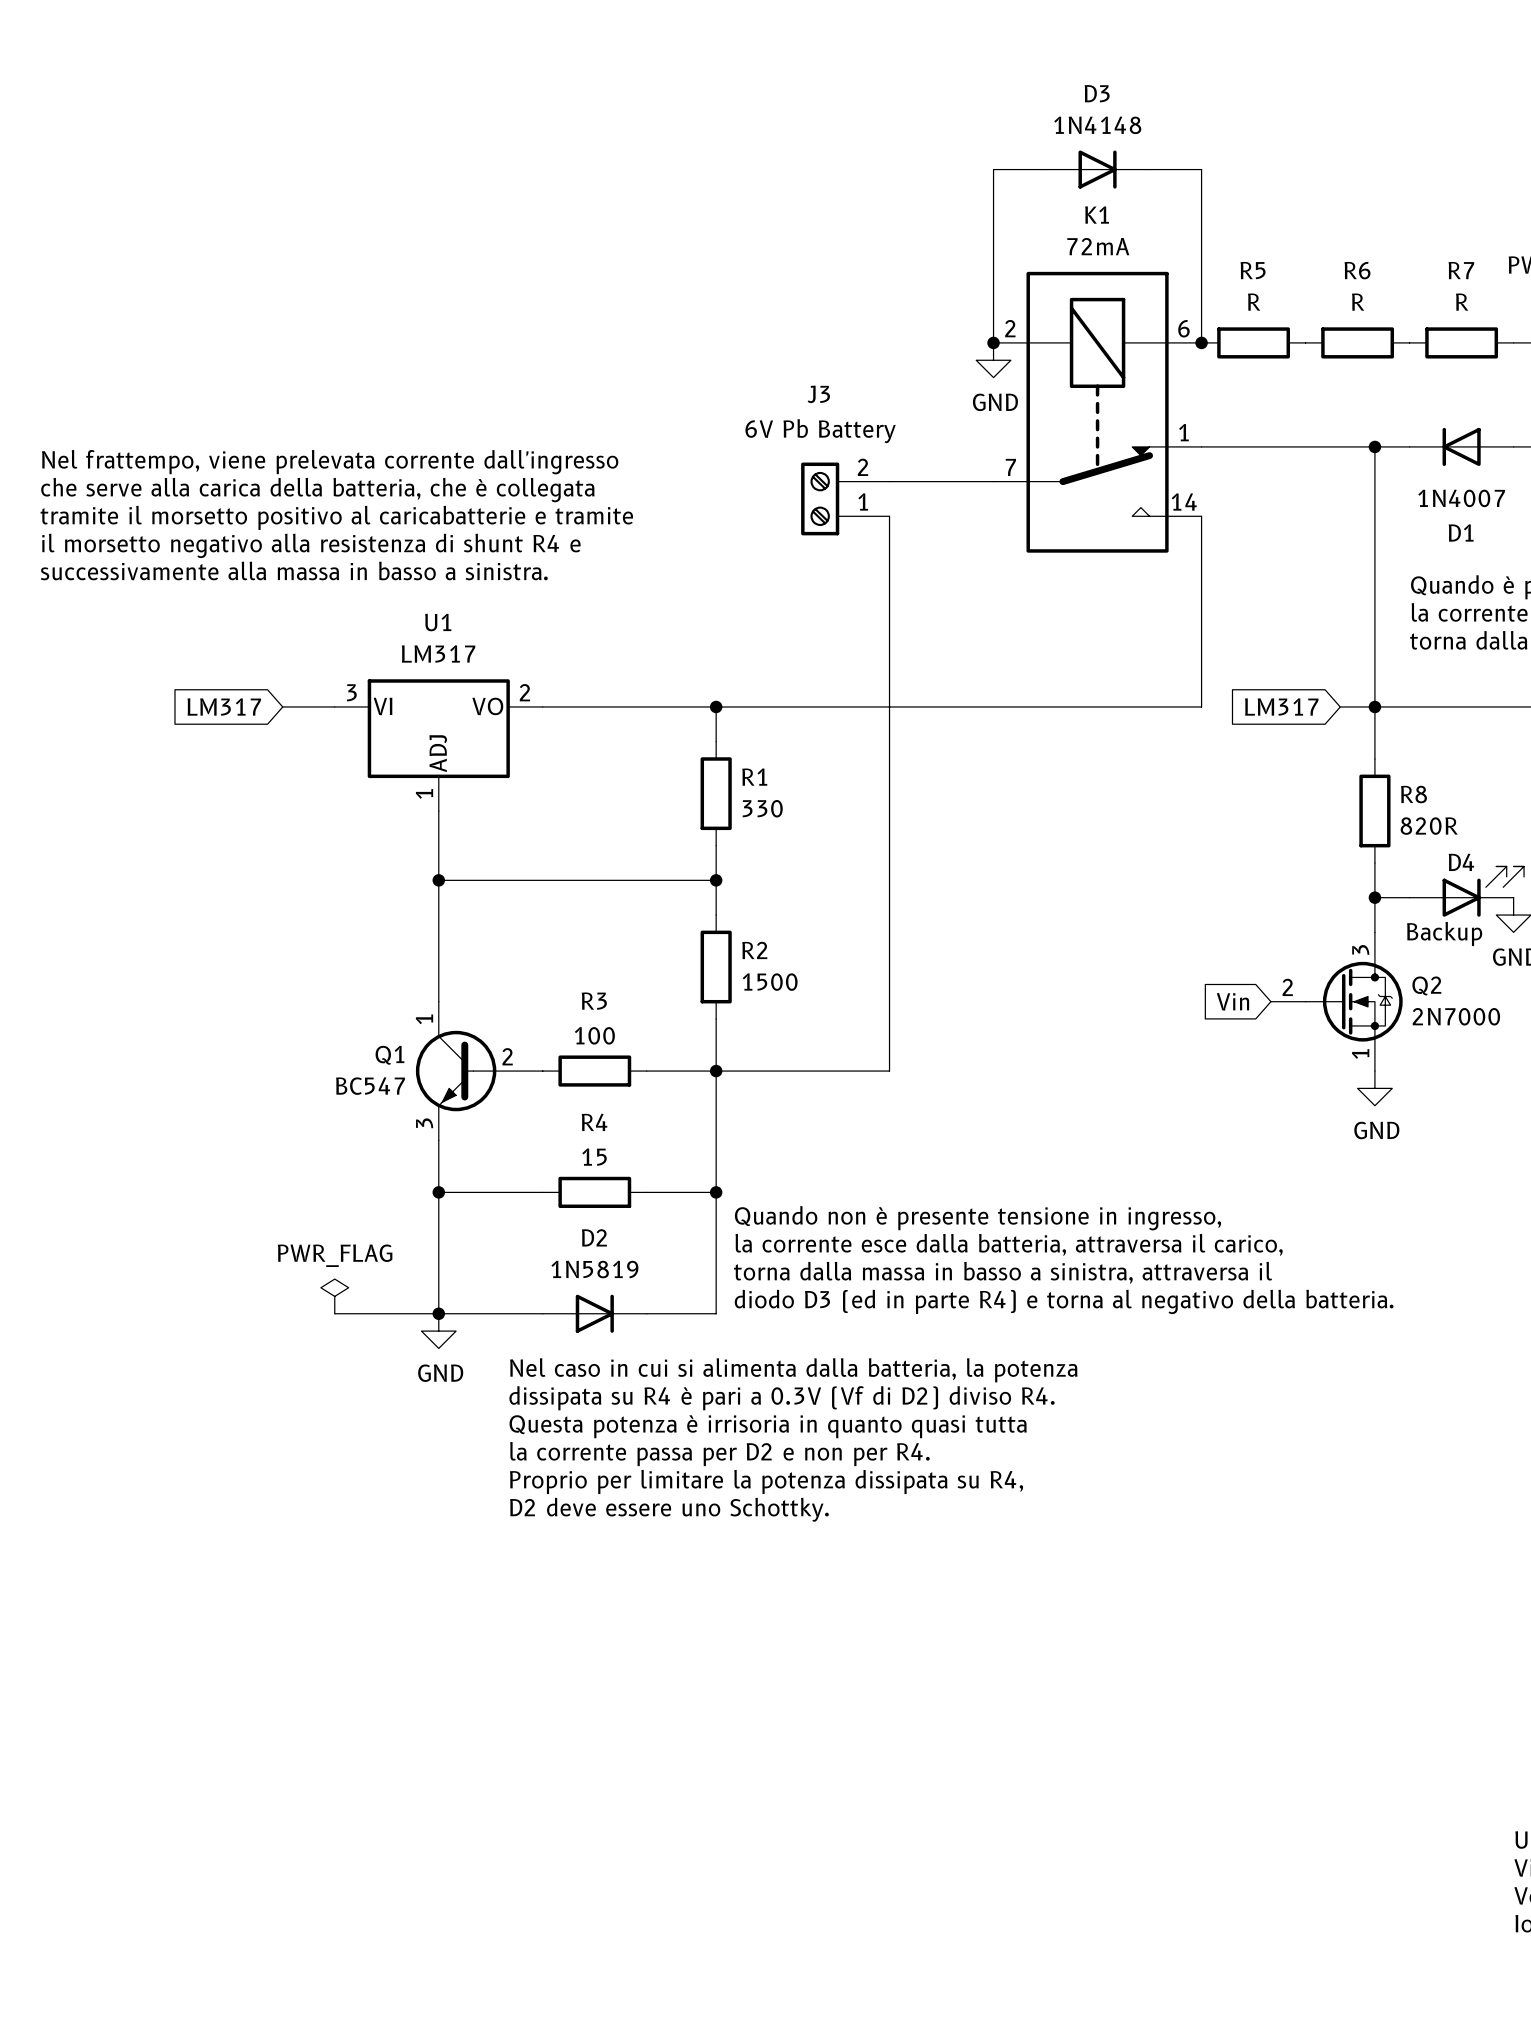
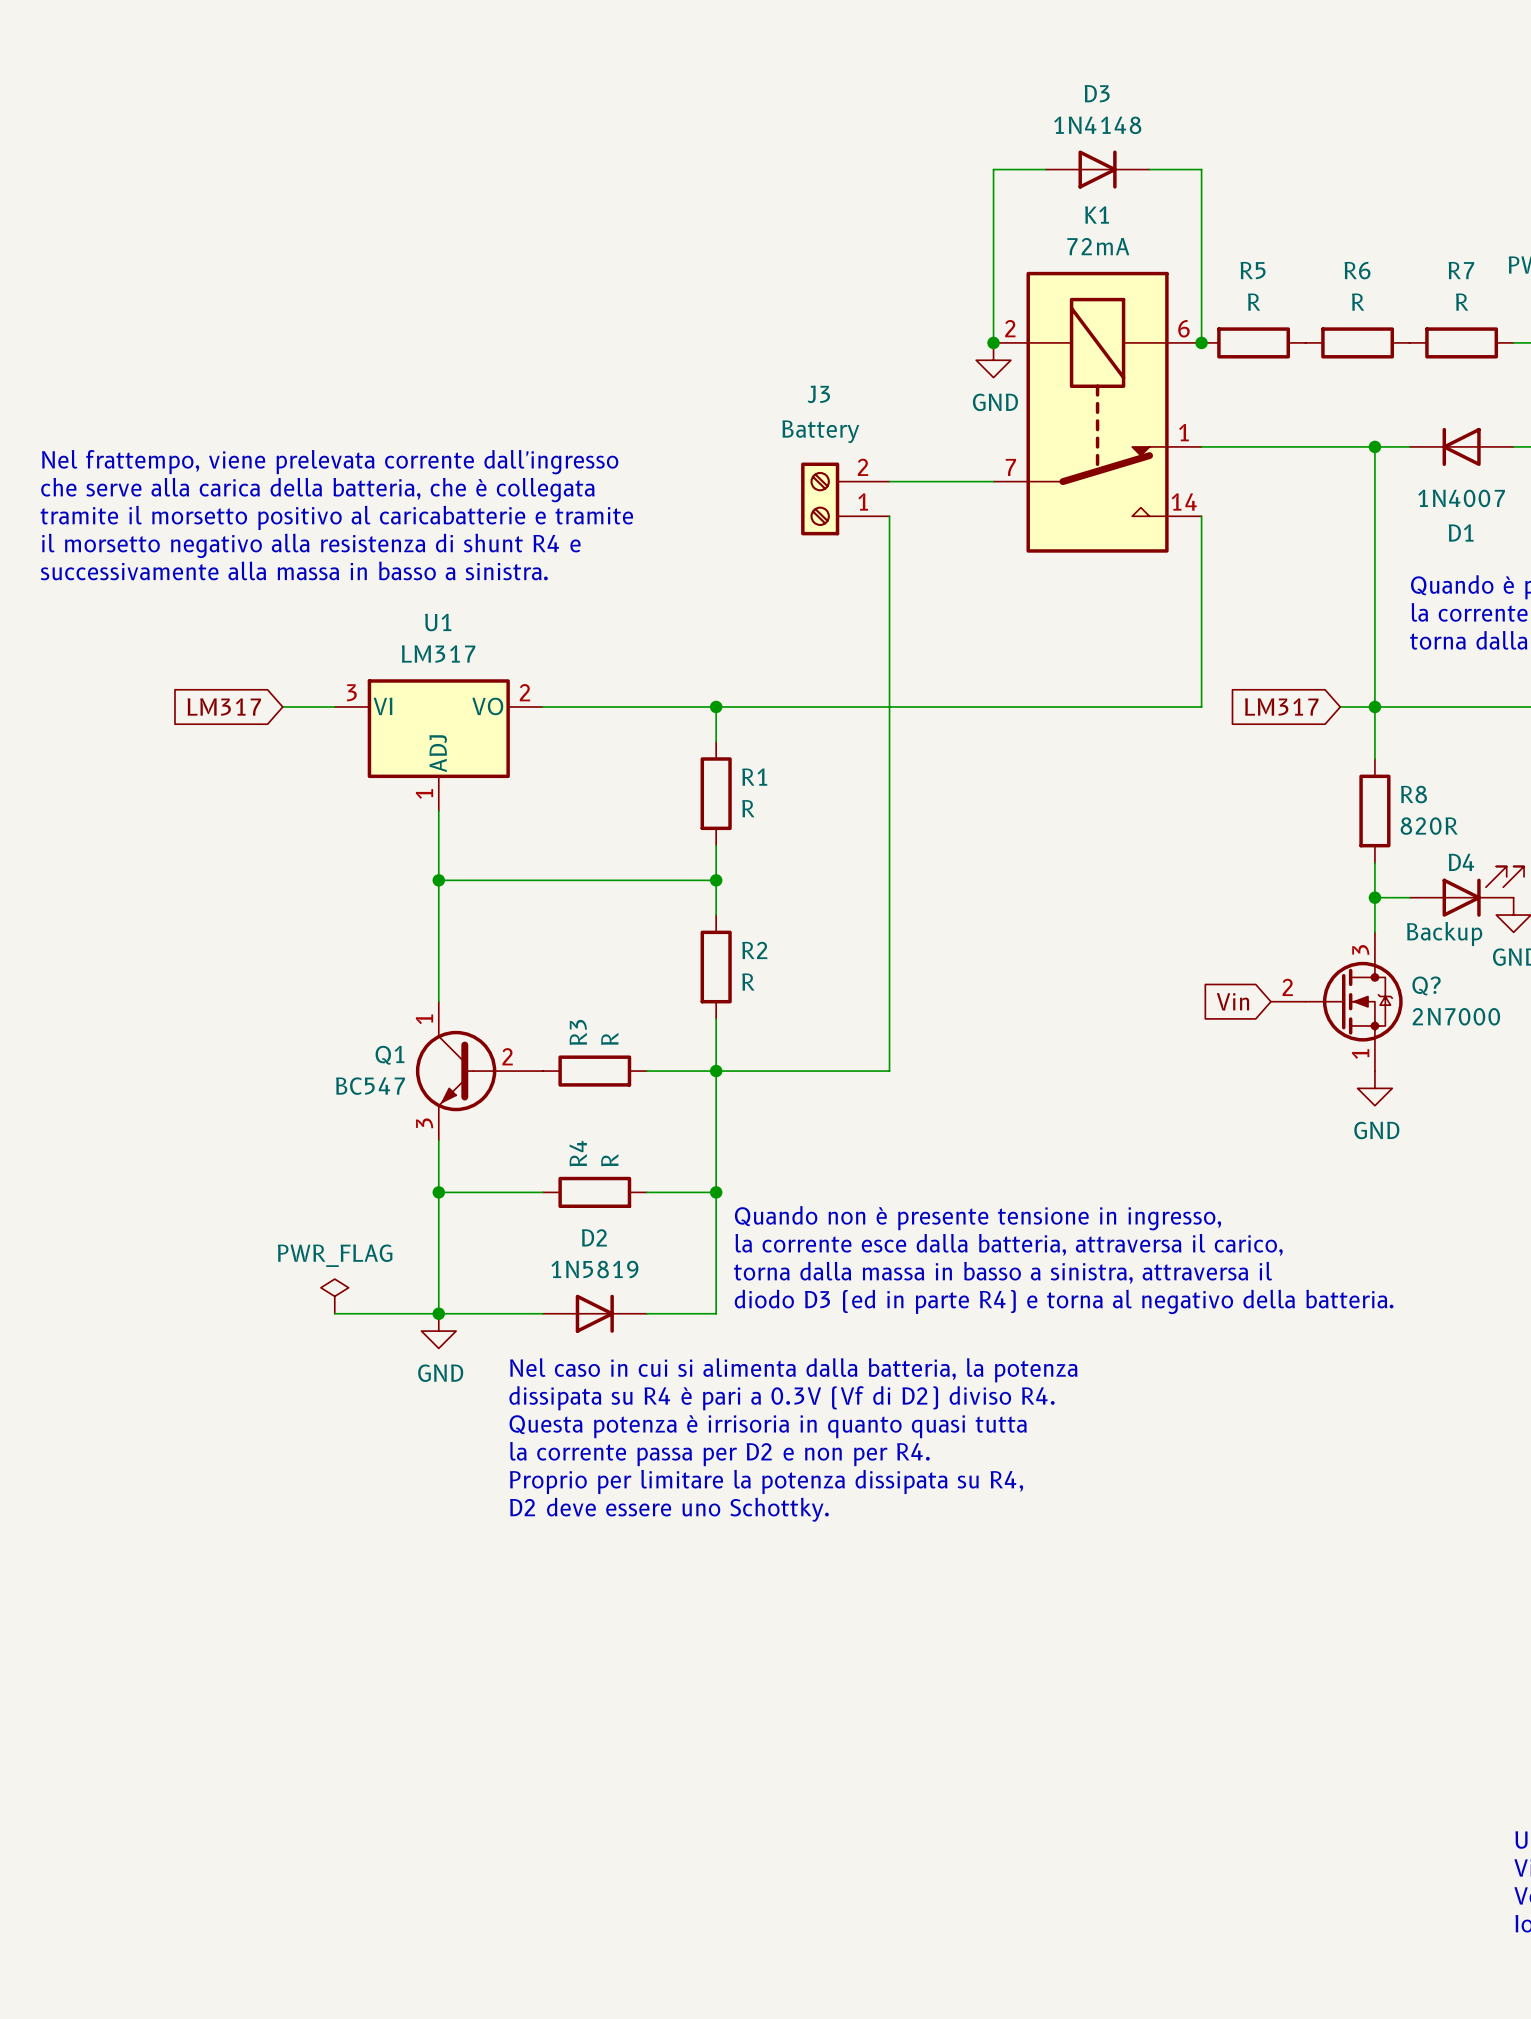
J3 value: 6V Pb Battery (820, 431) -> Battery (820, 431)
R1 value: 330 (762, 808) -> R (748, 808)
R2 value: 1500 (770, 982) -> R (748, 982)
Q2 name: Q2 (1426, 985) -> Q? (1426, 985)
R3 name rotation: 0° (594, 1001) -> 90° counterclockwise (578, 1032)
R3 value: 100 (594, 1035) -> R (609, 1038)
R4 name rotation: 0° (594, 1122) -> 90° counterclockwise (578, 1153)
R4 value: 15 (594, 1157) -> R (609, 1160)

